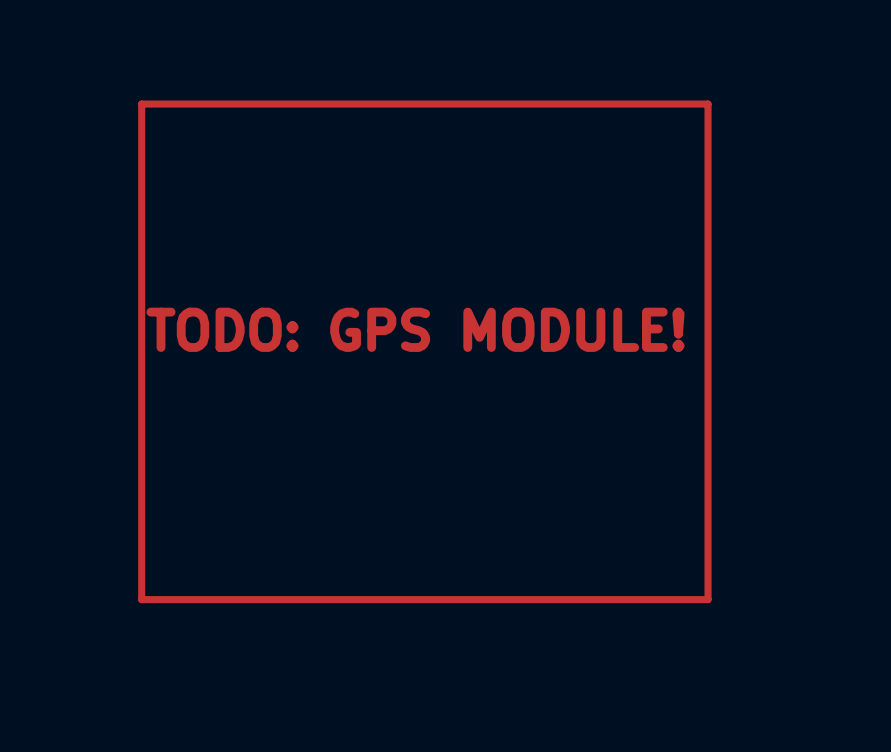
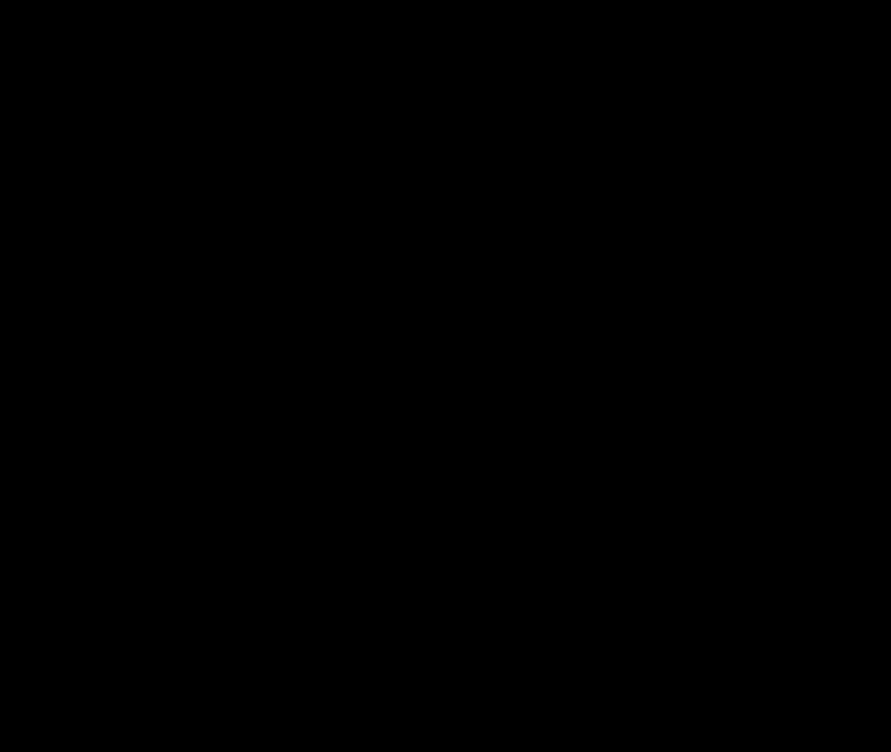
top track: (141, 104) (708, 104) (708, 599) (141, 599) (141, 104) -> none
text: TODO: GPS MODULE! (415, 329) -> none

